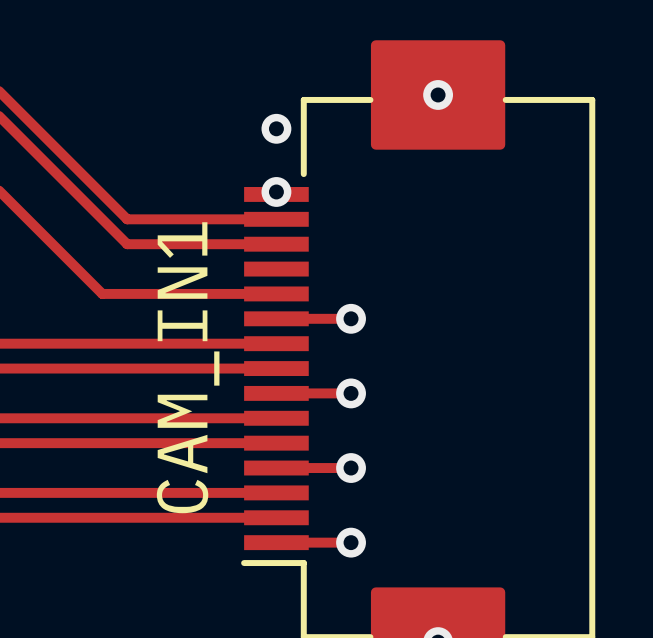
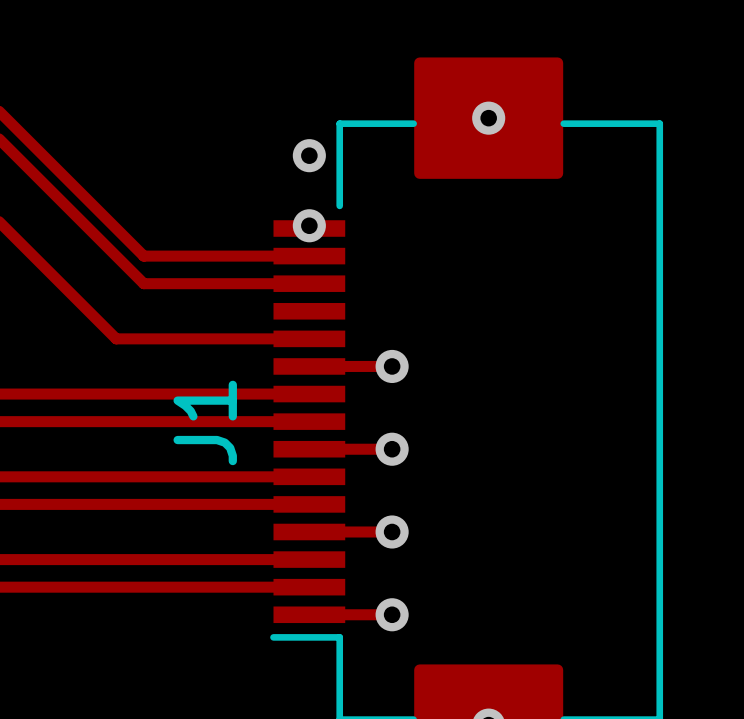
CAM_IN1 name: CAM_IN1 (188, 367) -> J1 (205, 422)

